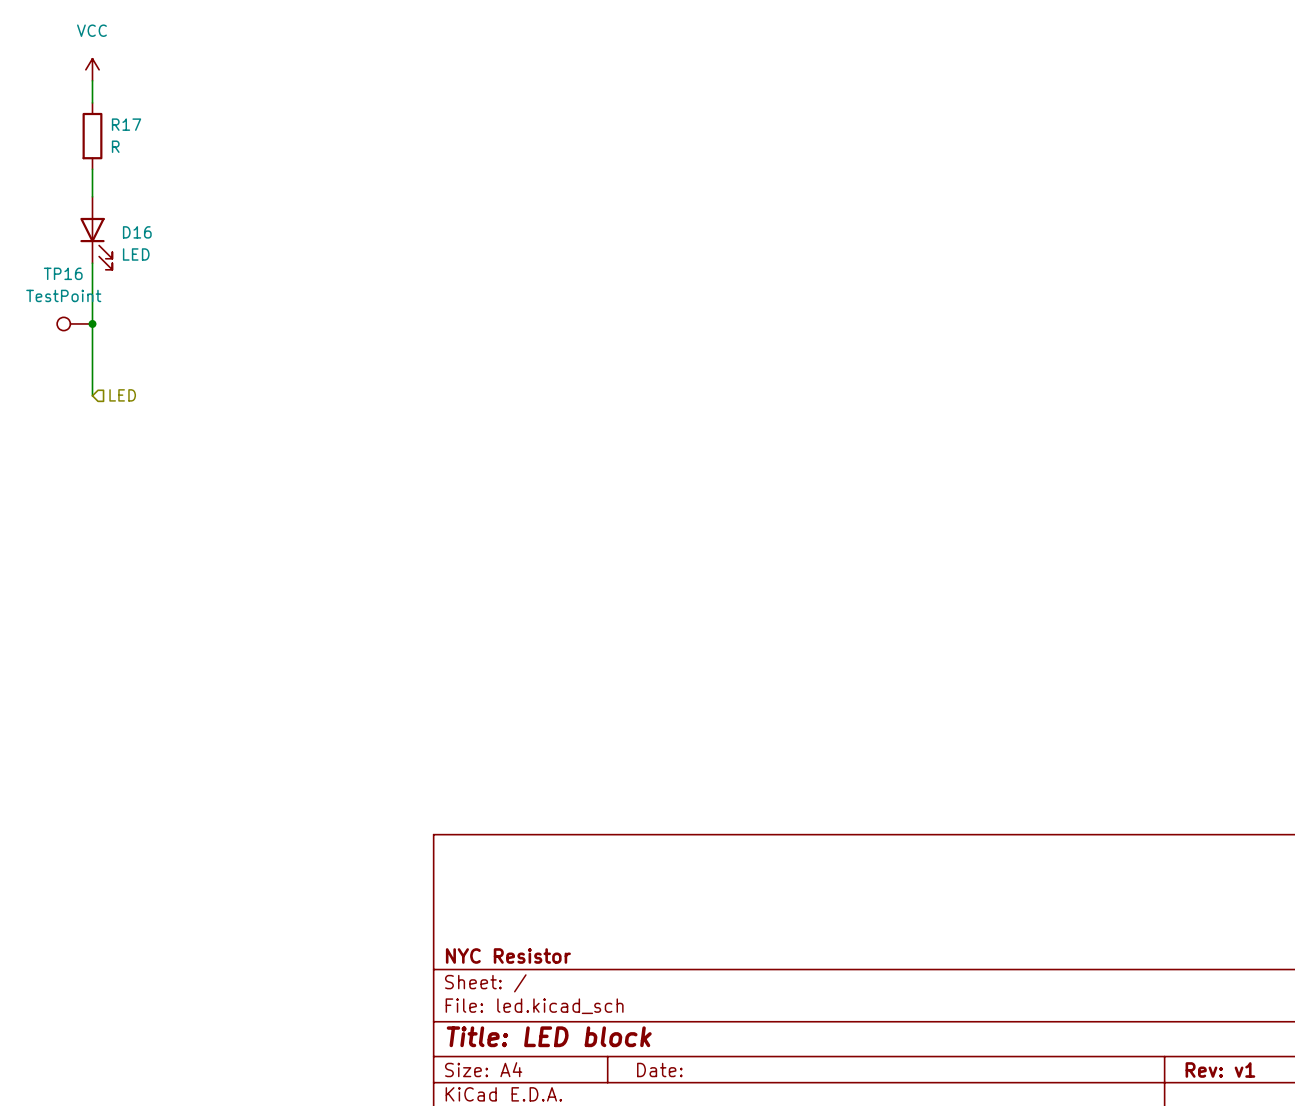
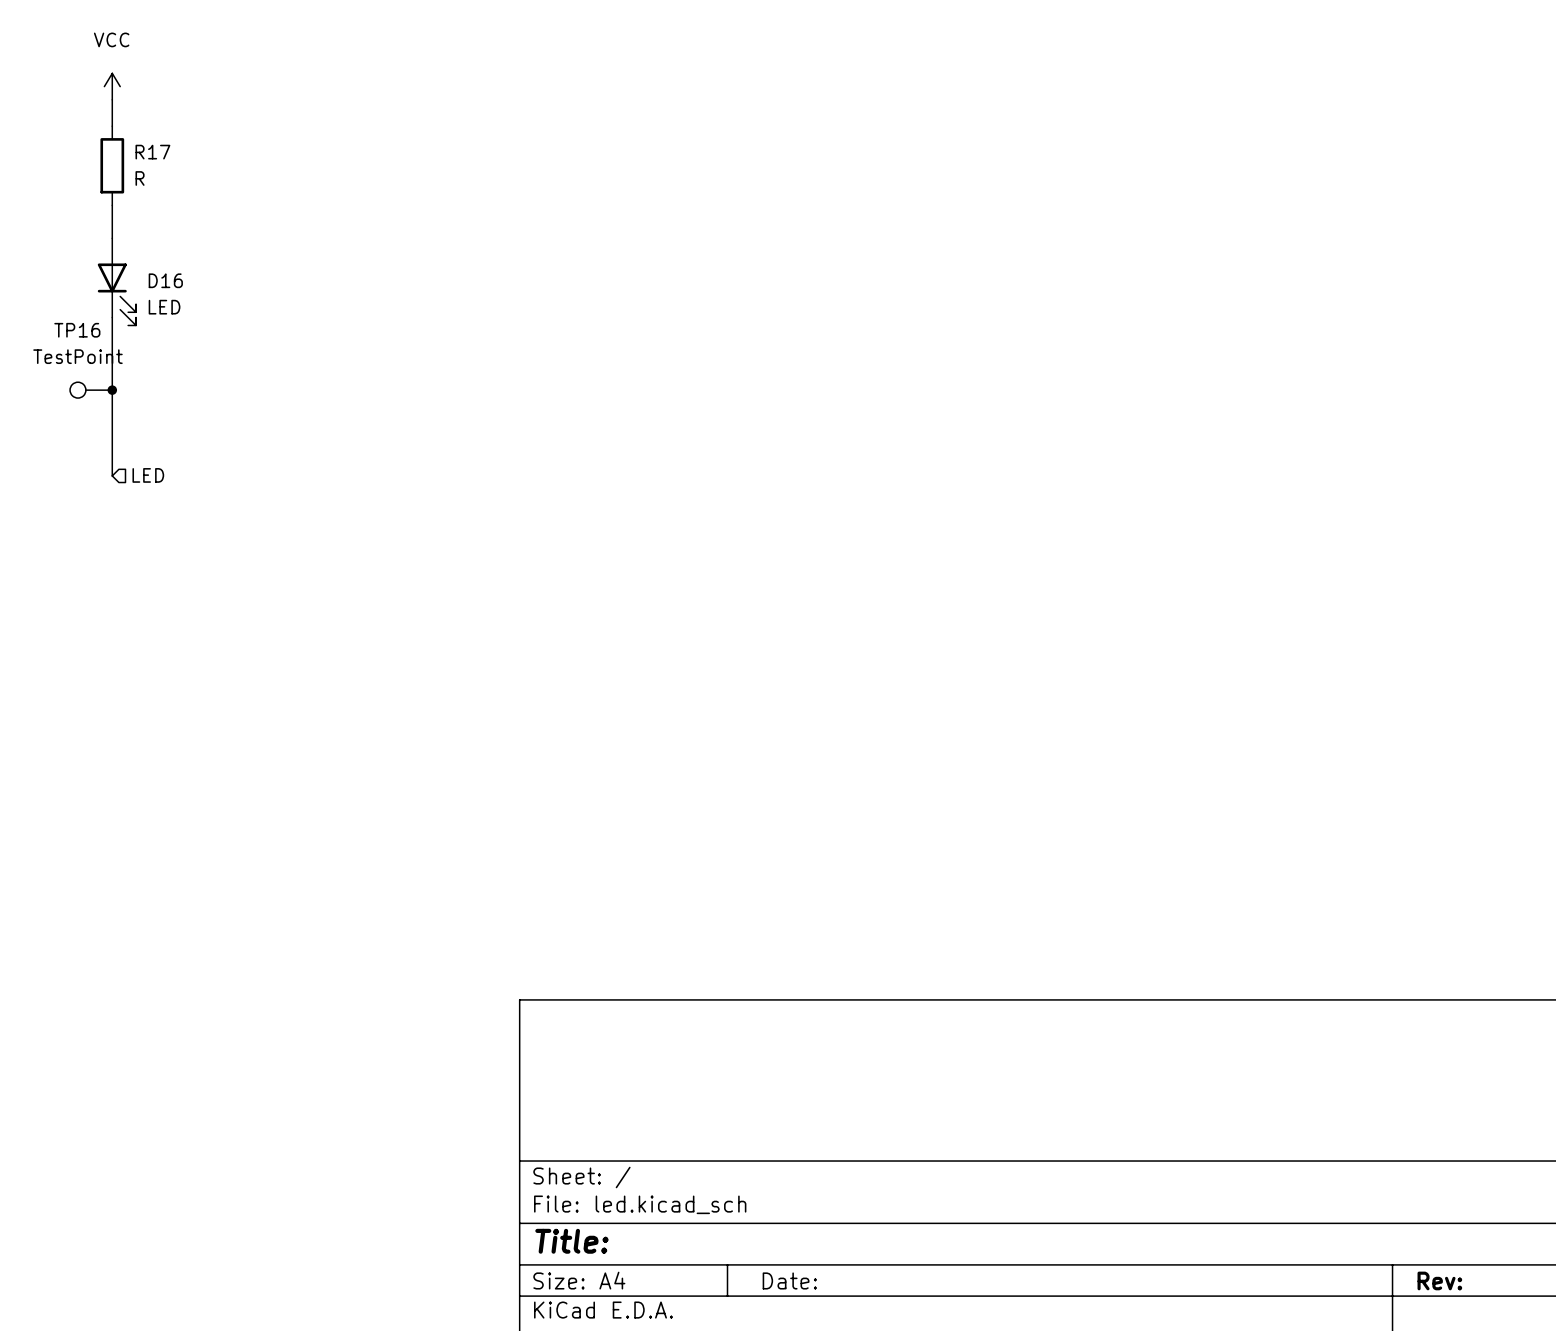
title block: NYC Resistor (508, 955) -> none
title block: Title: LED block (549, 1036) -> Title: (571, 1241)
title block: Rev: v1 (1220, 1069) -> Rev: (1439, 1280)

